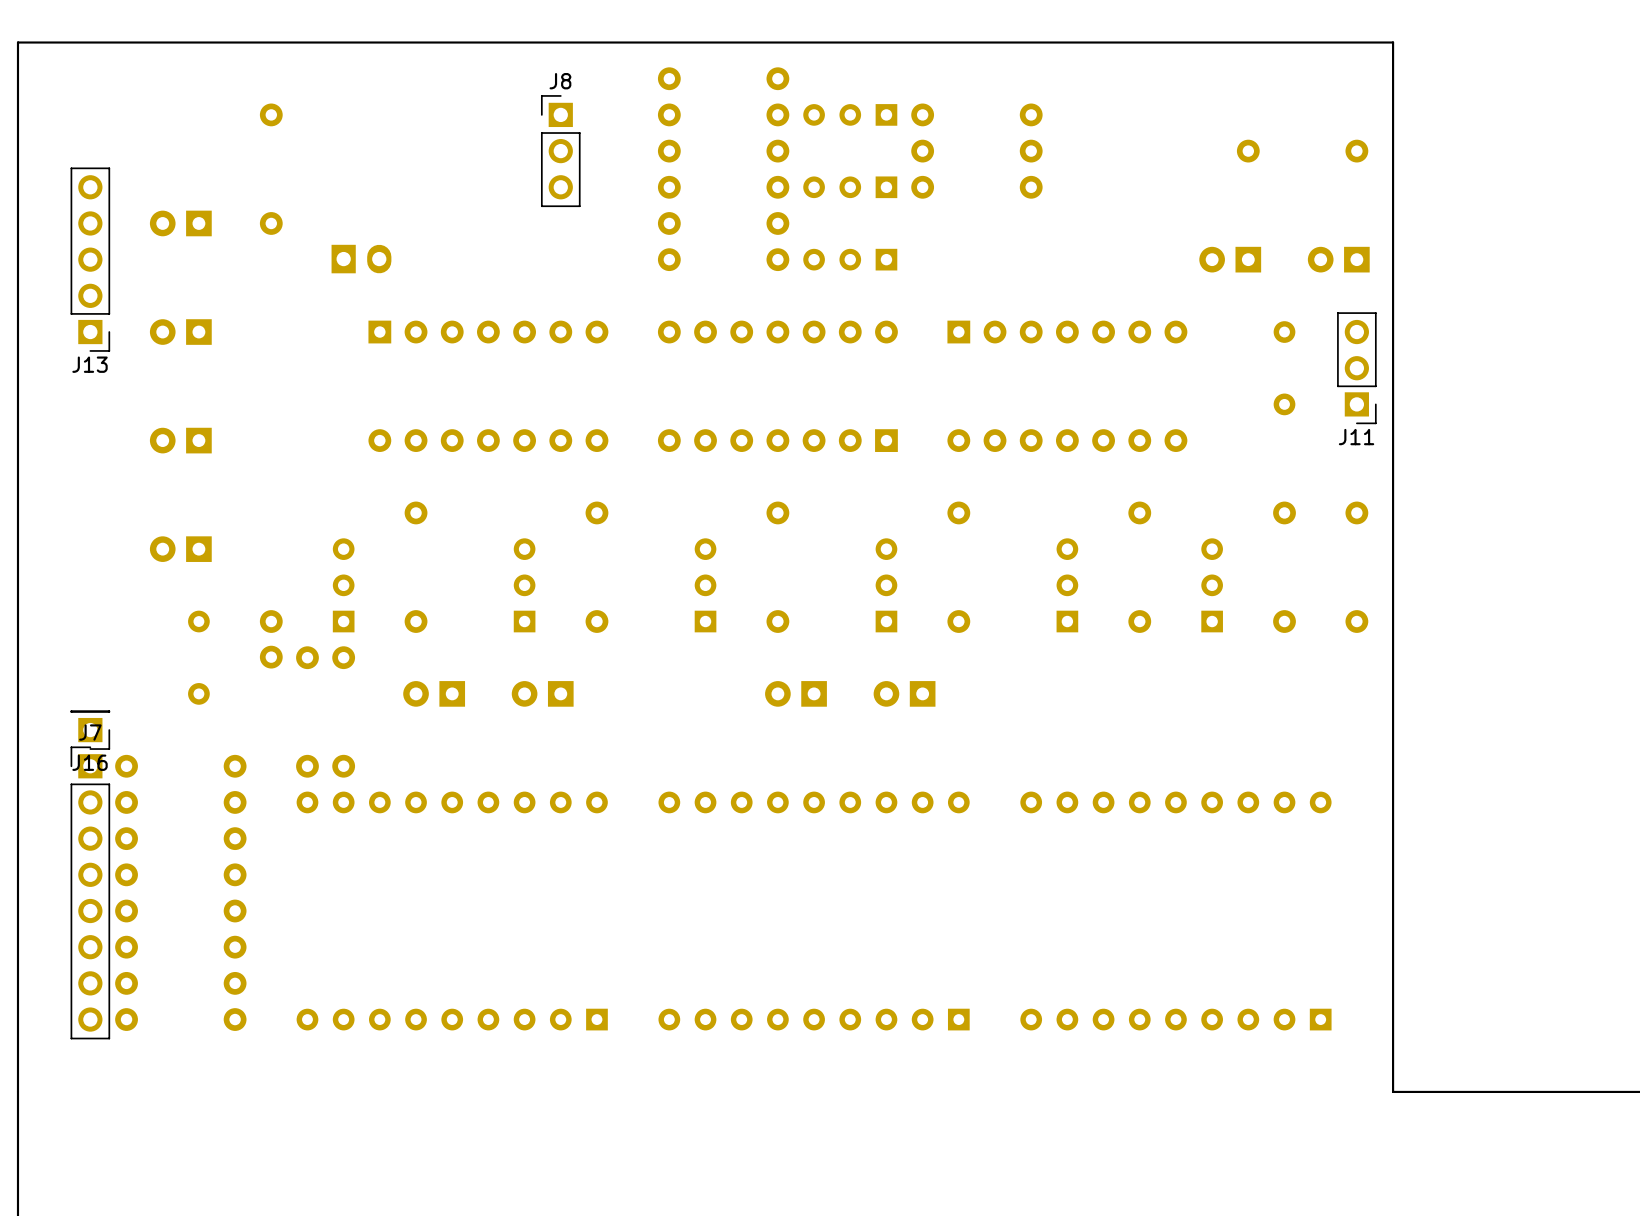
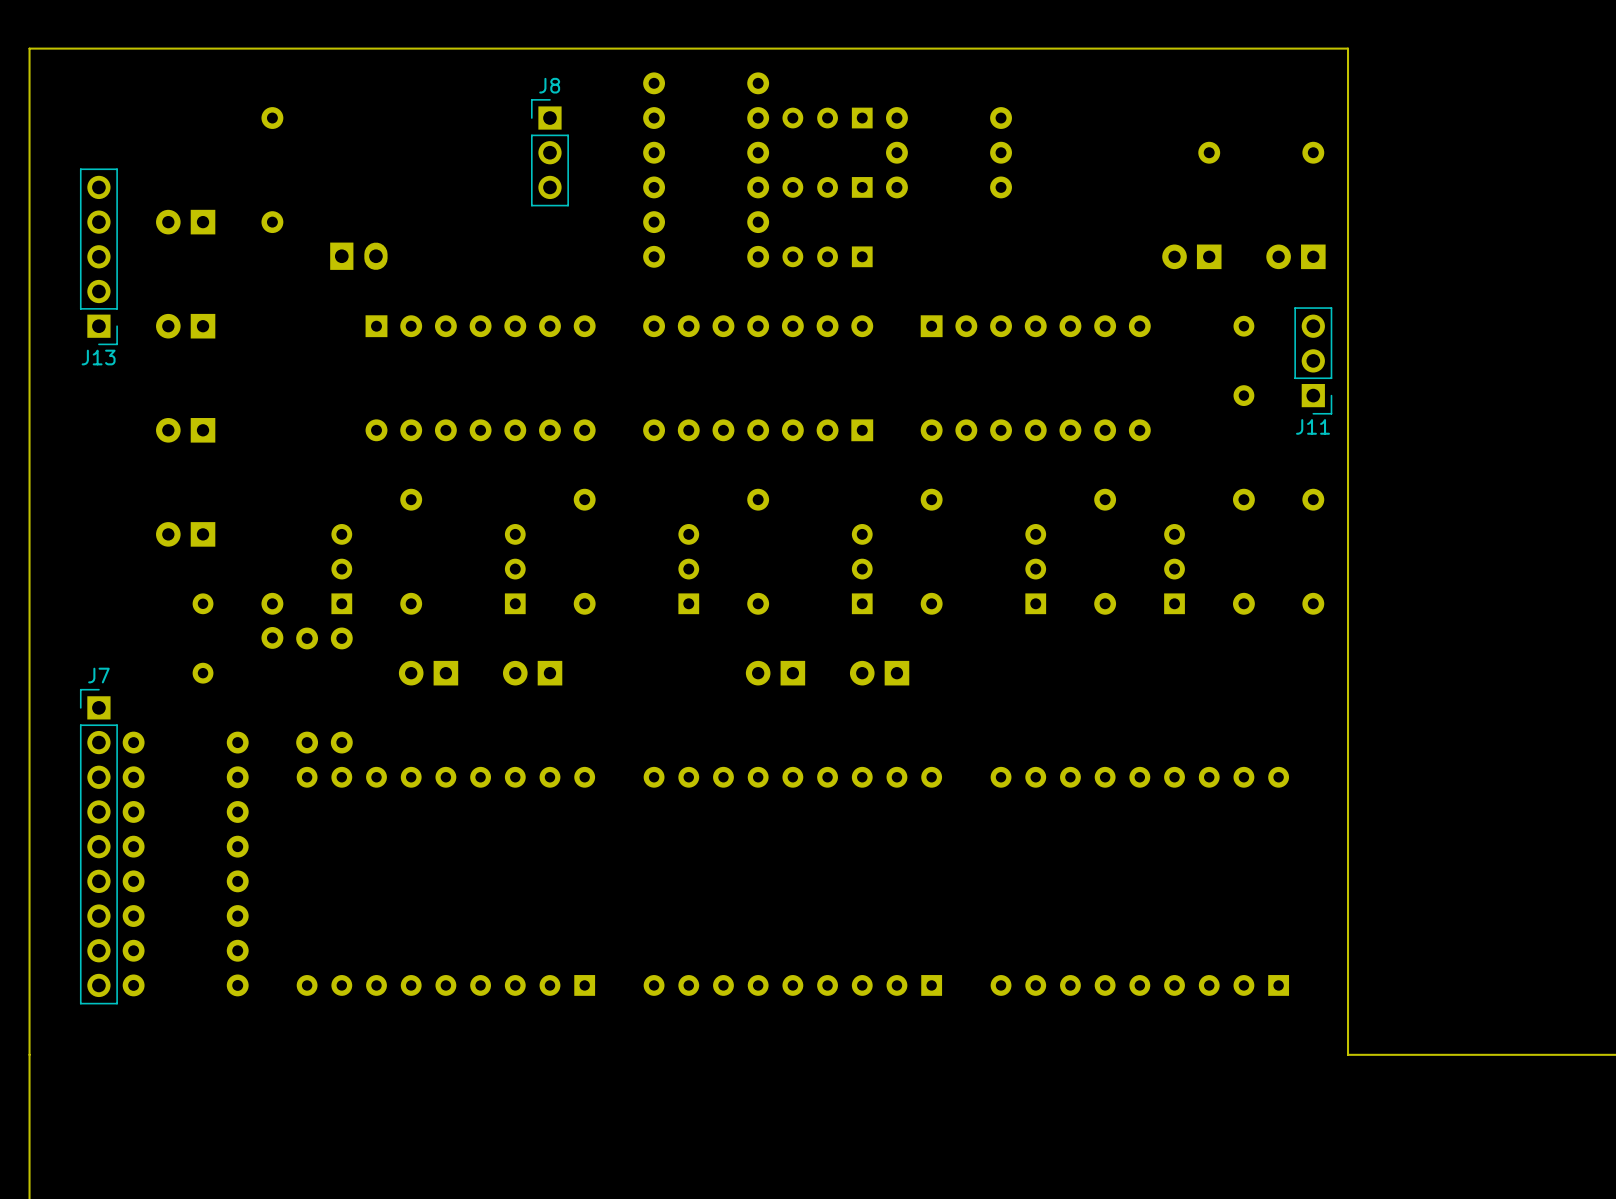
J16: (90, 730) -> none
J7 footprint: [70, 746, 111, 1040] -> [79, 688, 118, 1005]

